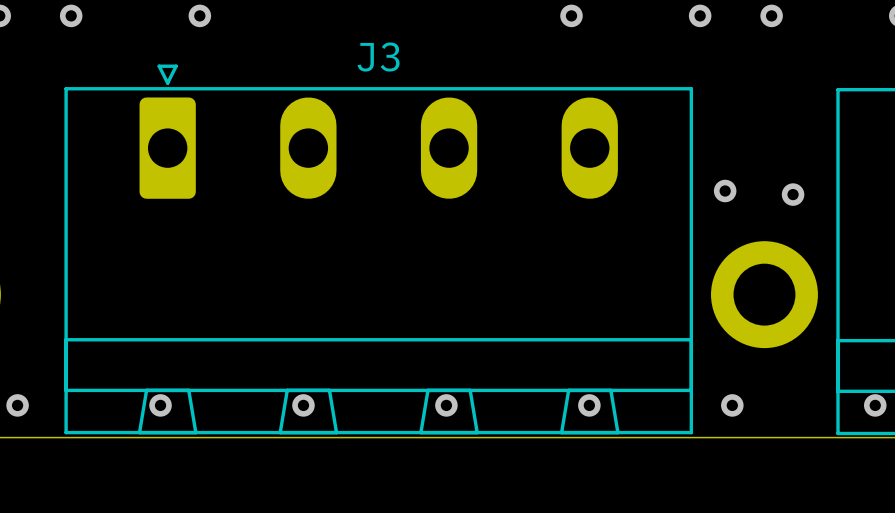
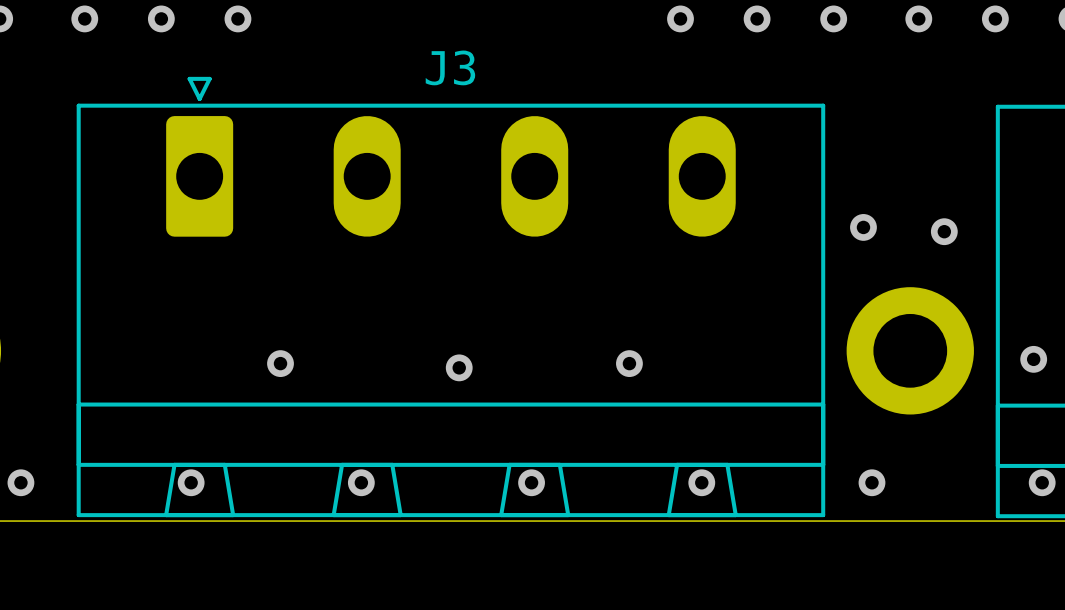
via: none -> (161, 18)
via: none -> (757, 18)
via: none -> (995, 18)
via: none -> (1033, 359)
via: none -> (280, 363)
via: none -> (629, 363)
via: none -> (459, 367)

